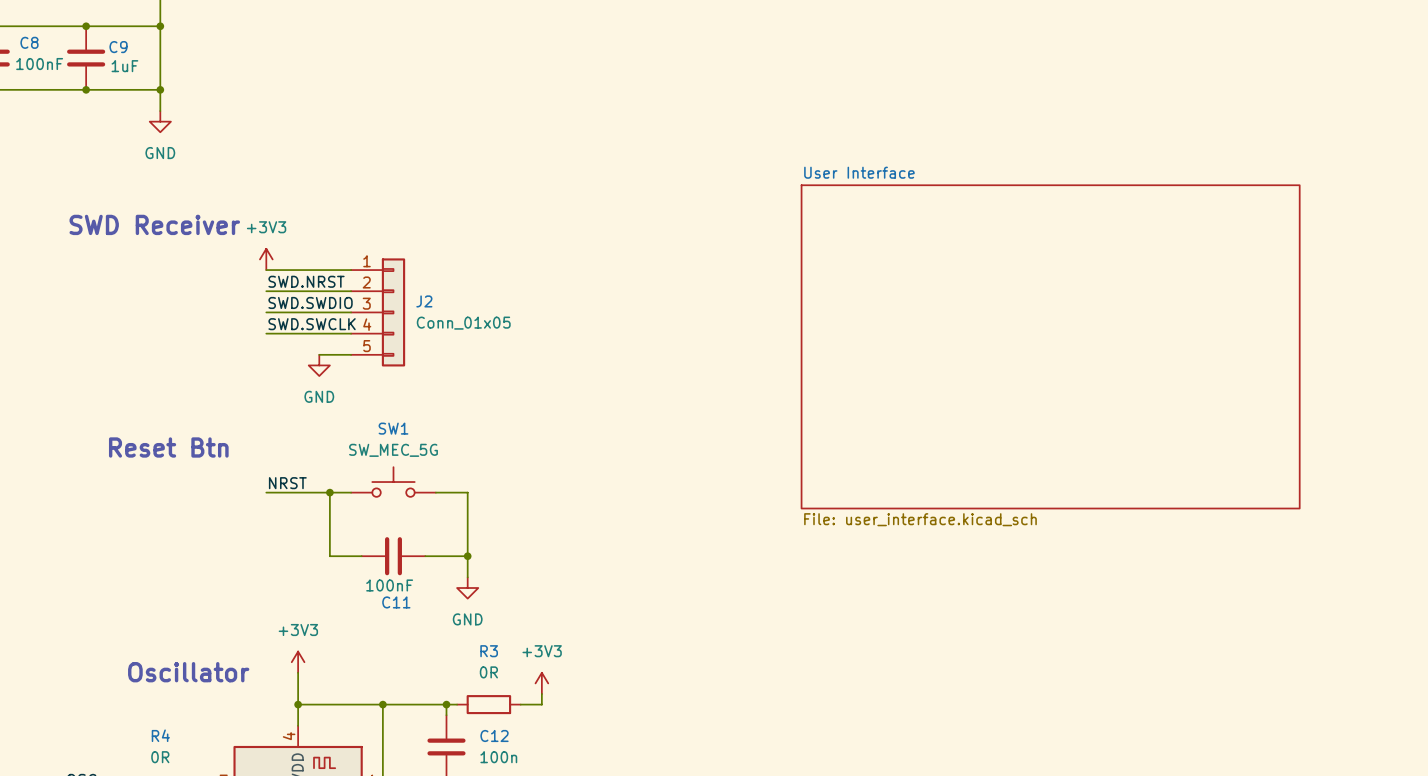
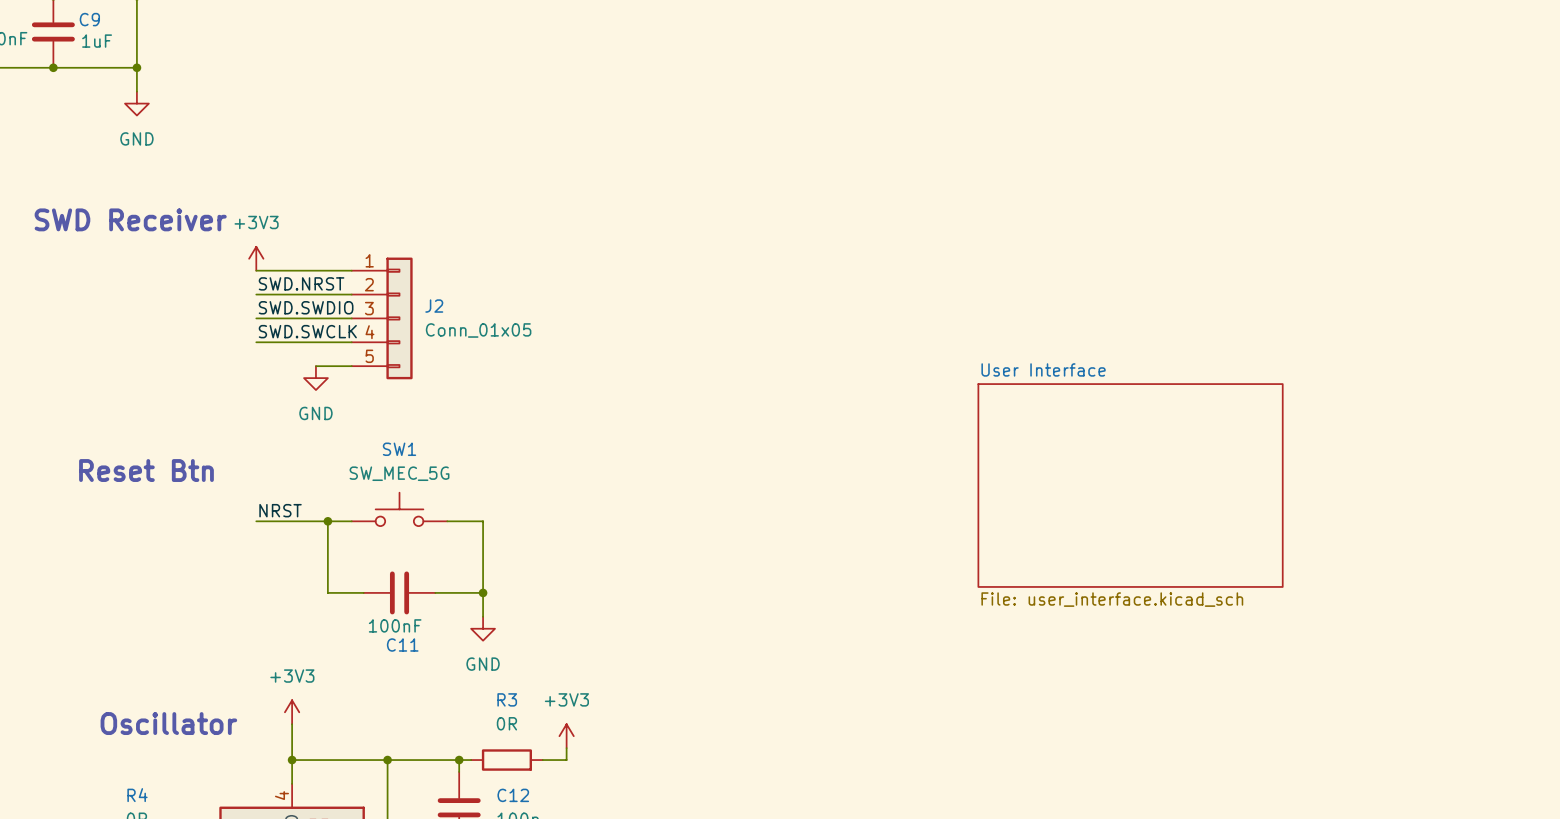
sheet User Interface: File: user_interface.kicad_sch (1050, 346) -> none
sheet User Interface: none -> File: user_interface.kicad_sch (1130, 485)

